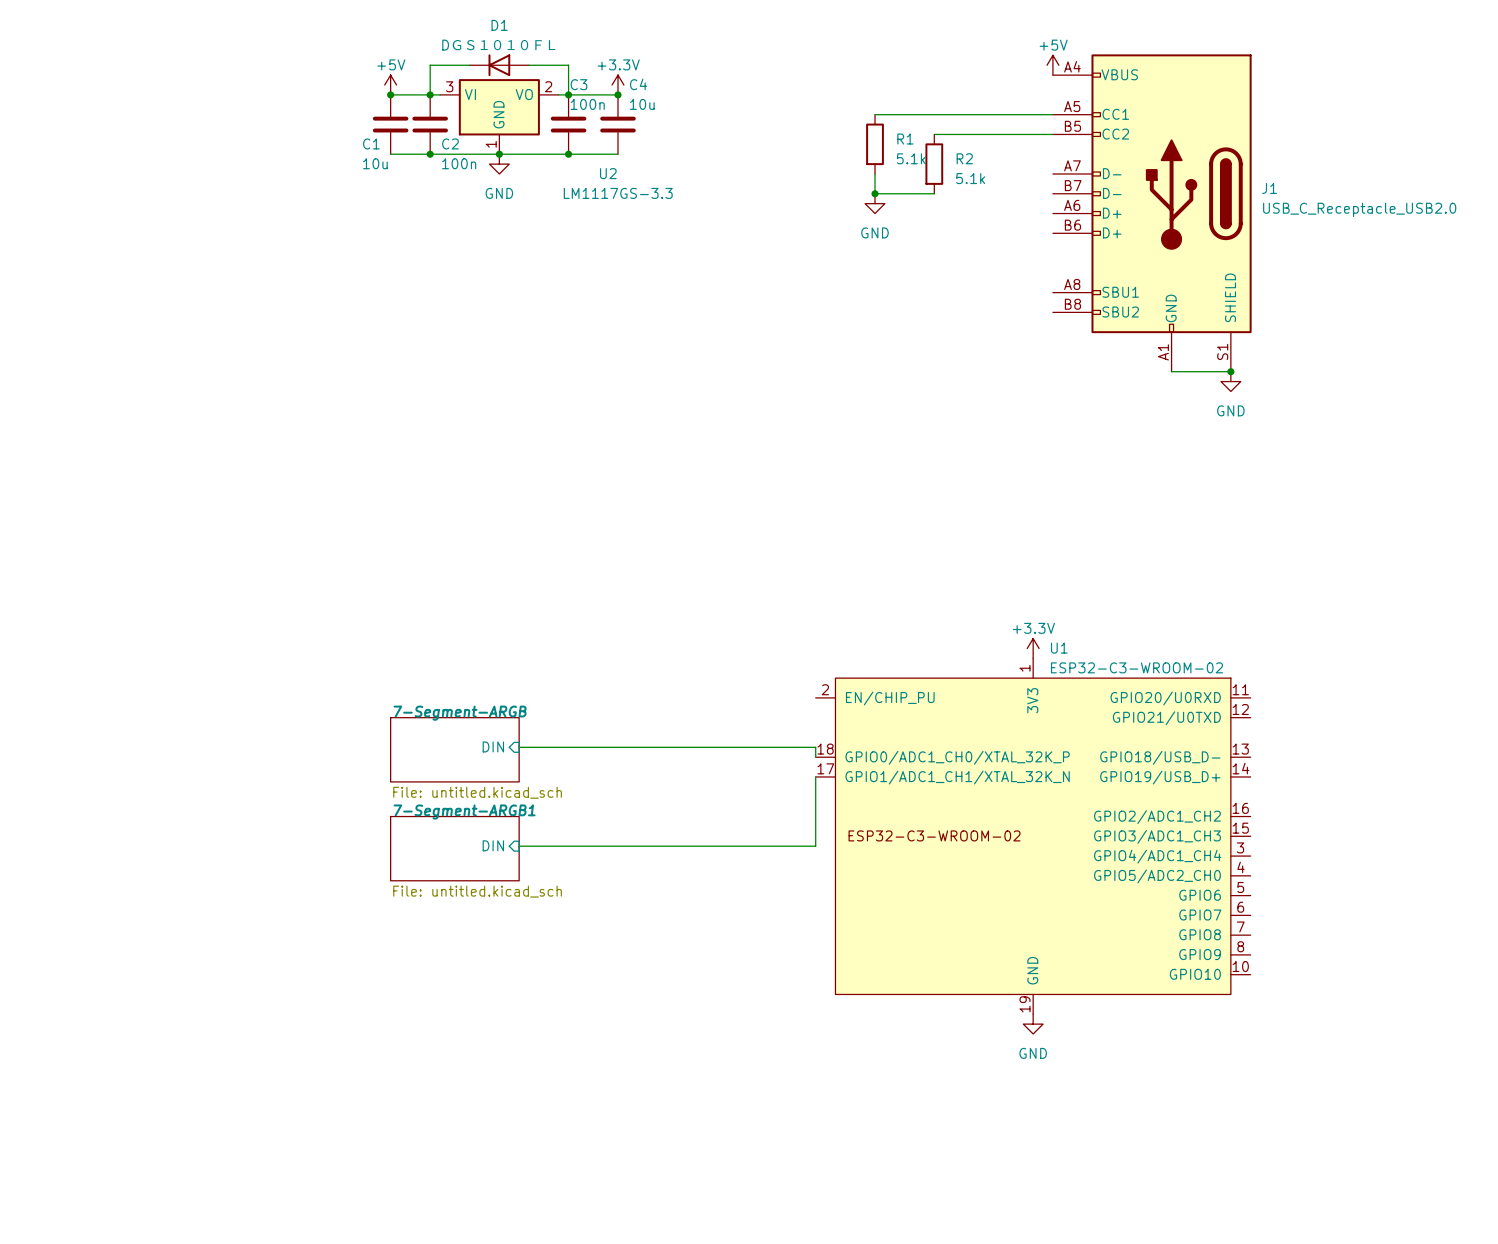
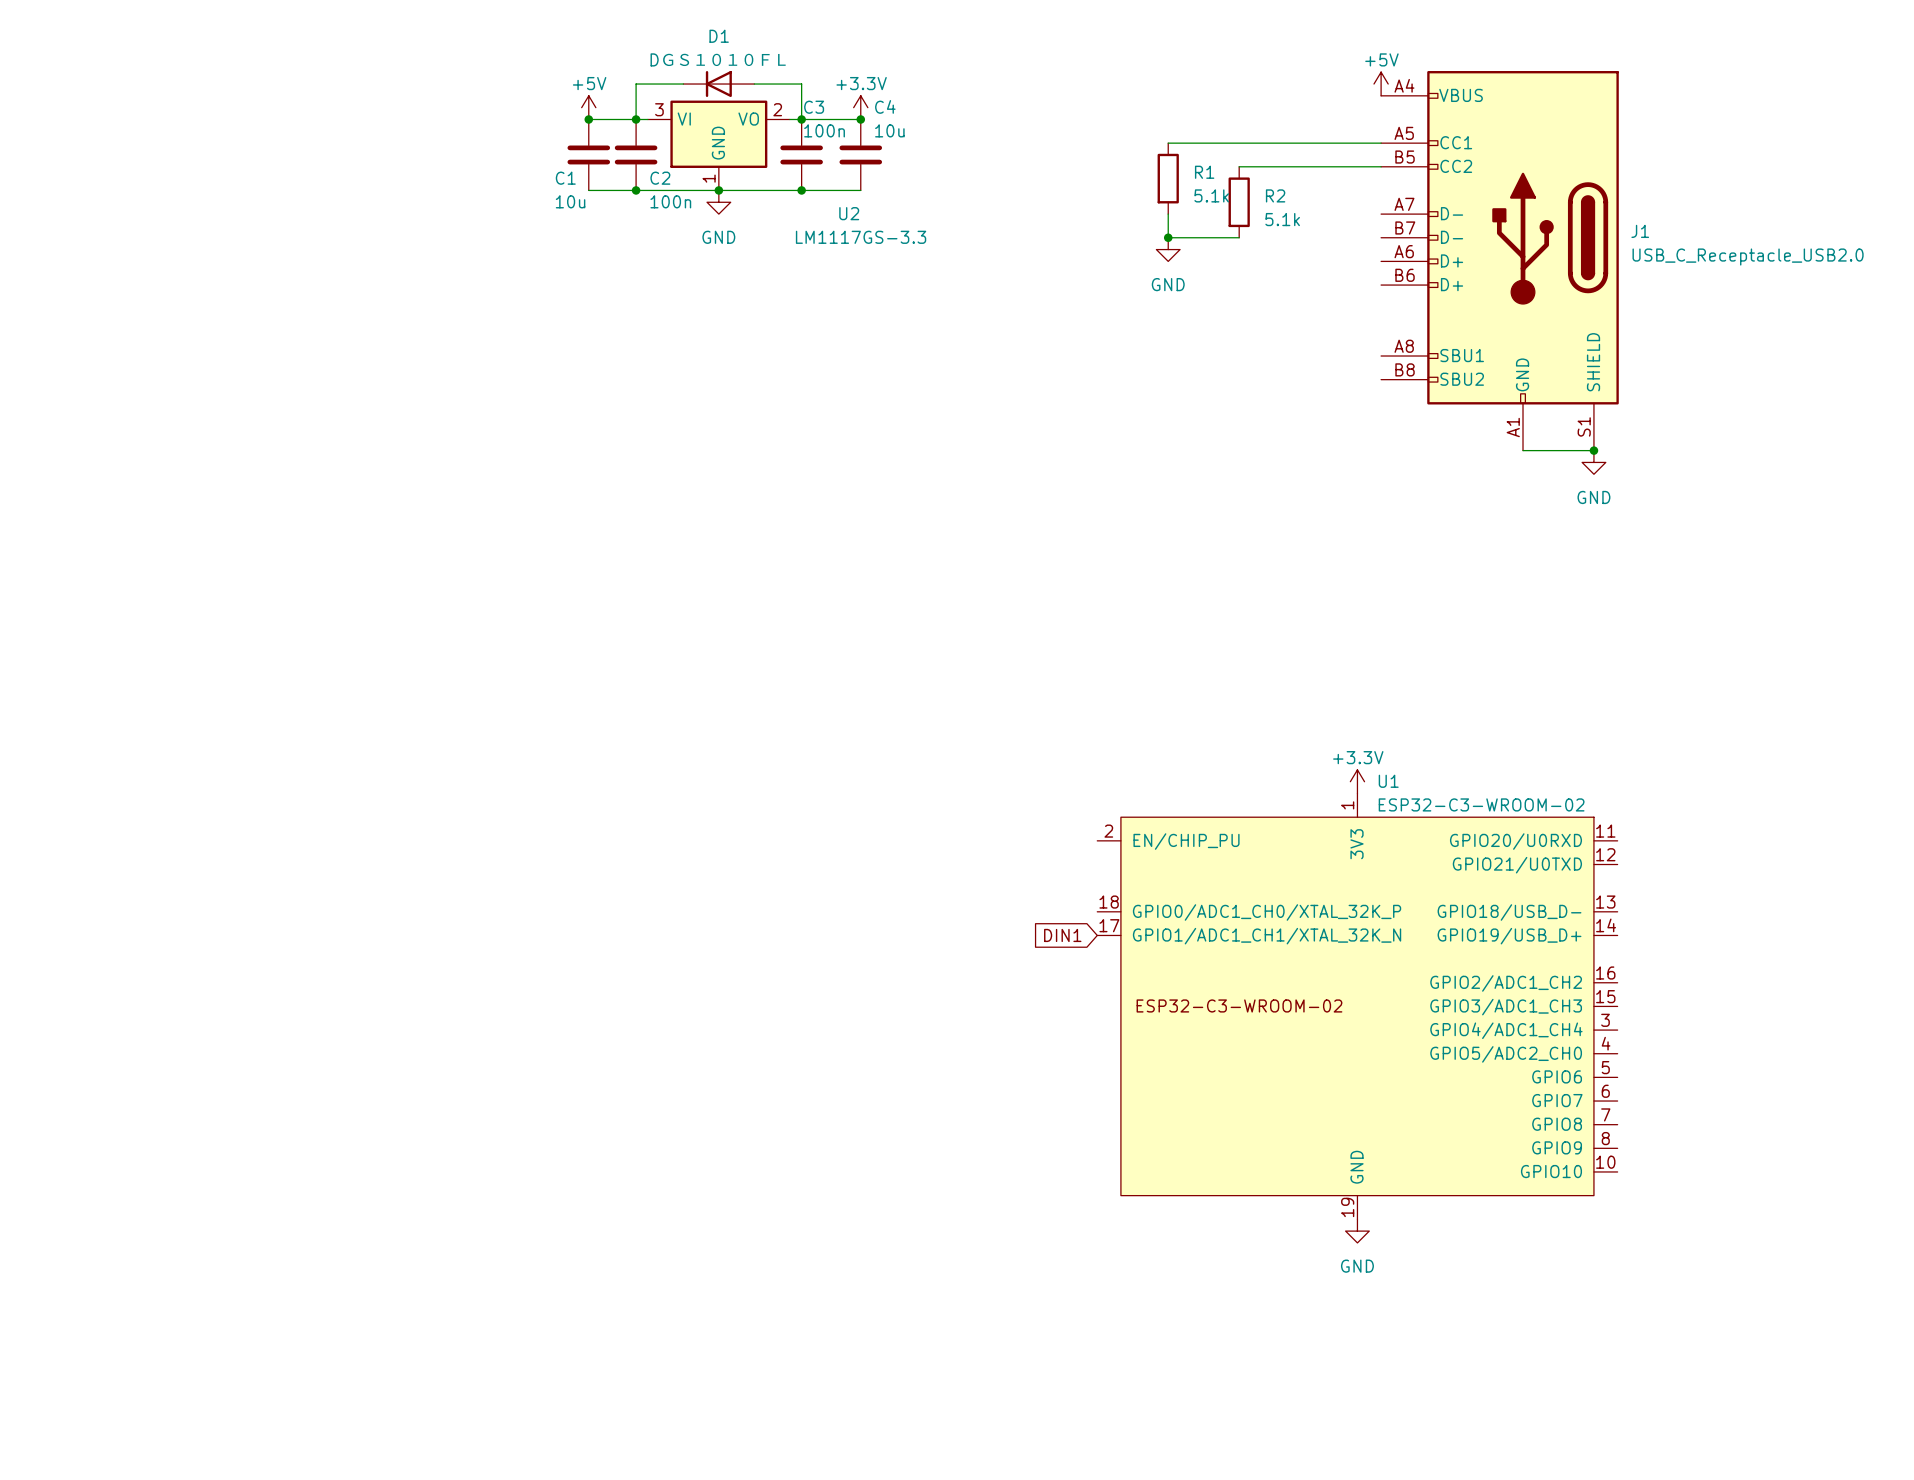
sheet pin: DIN (493, 746) -> none
wire: (519, 747) (815, 747) (815, 757) -> none
sheet 7-Segment-ARGB: File: untitled.kicad_sch (454, 749) -> none
global label: none -> DIN1 (1062, 935)
wire: (815, 776) (815, 846) (519, 846) -> none
sheet pin: DIN (493, 845) -> none
sheet 7-Segment-ARGB1: File: untitled.kicad_sch (454, 848) -> none

